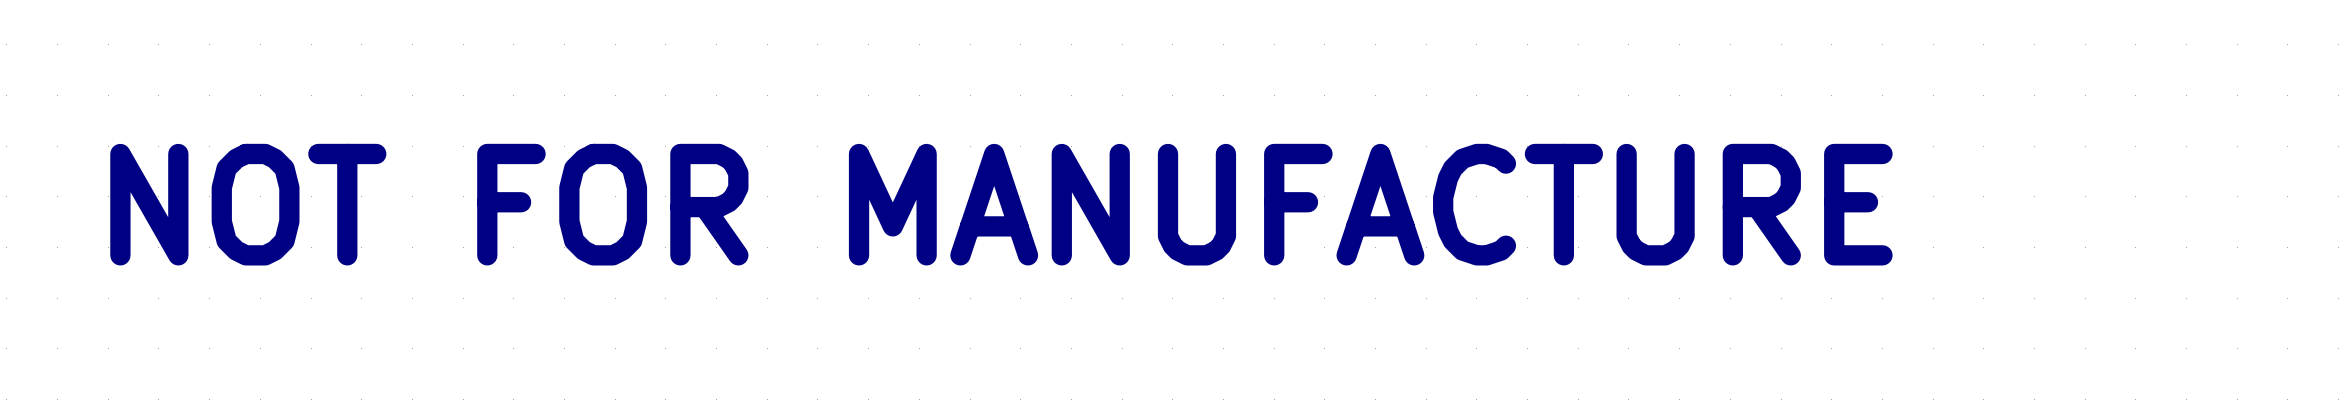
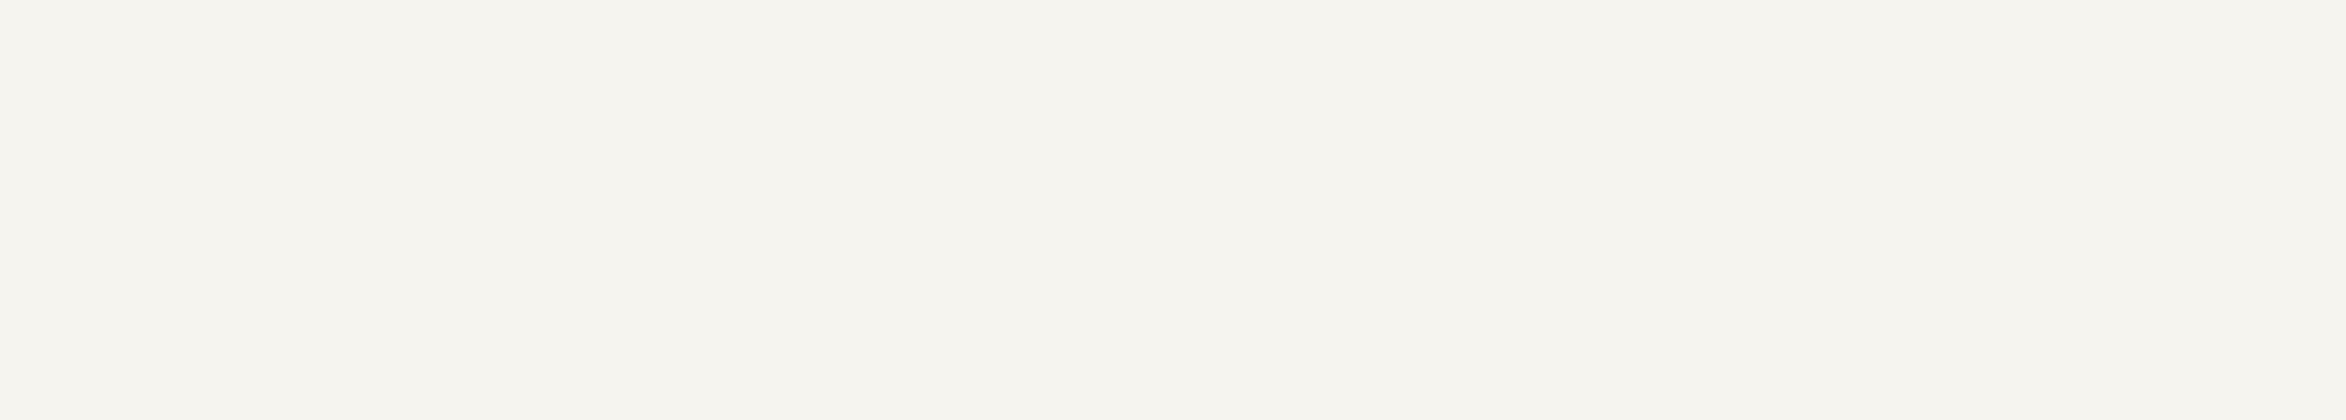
text: NOT FOR MANUFACTURE (1001, 204) -> none

